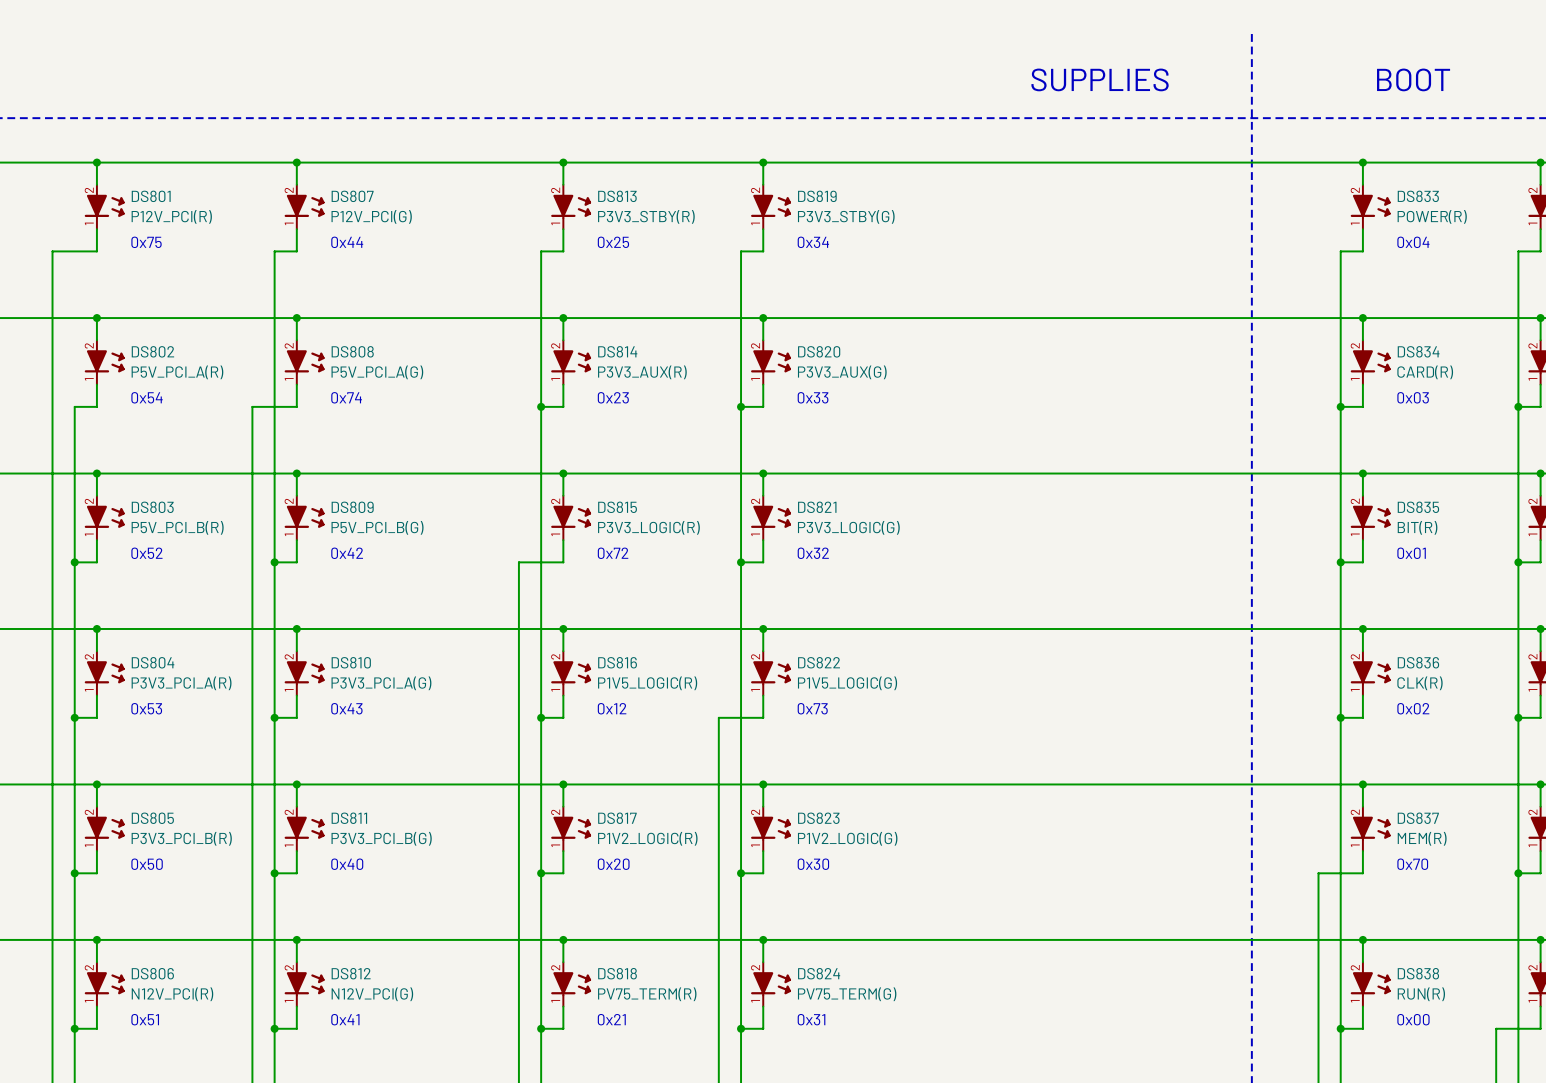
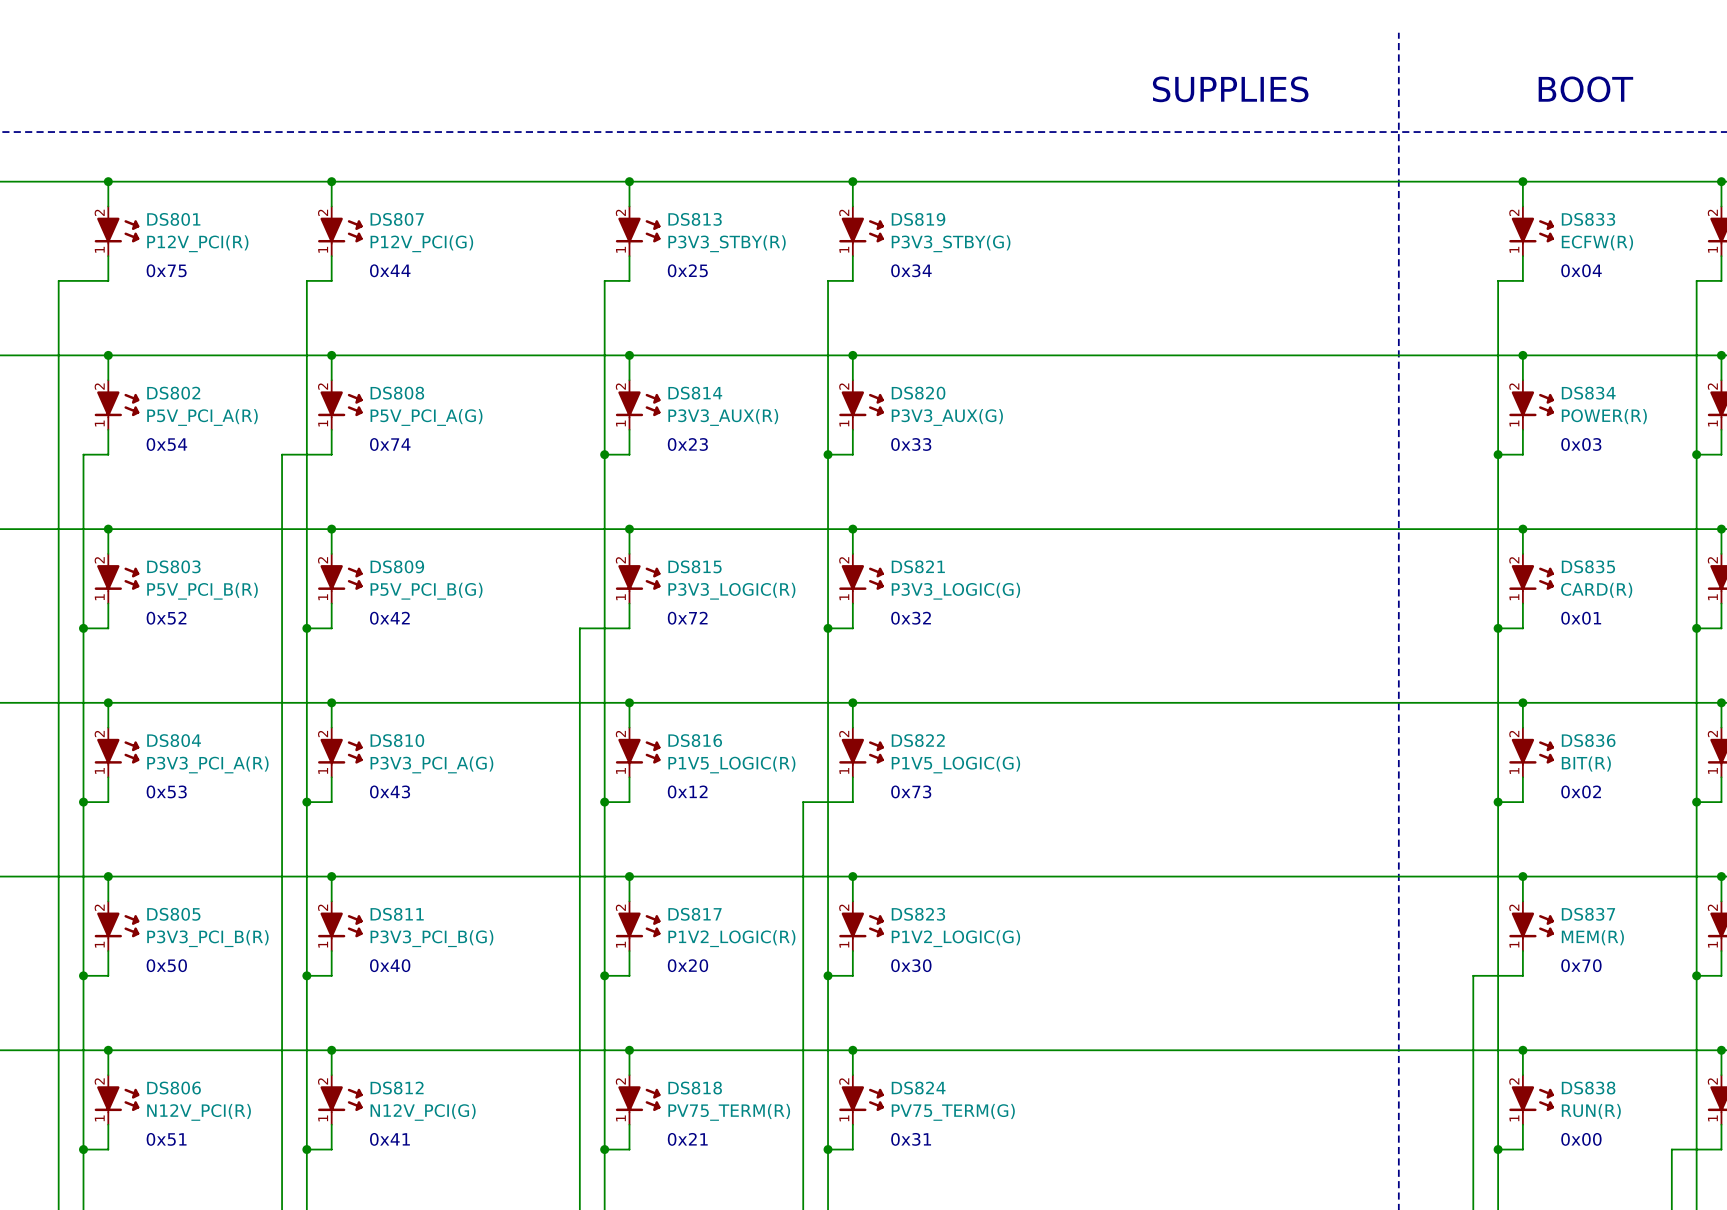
DS833 value: POWER(R) (1432, 216) -> ECFW(R) (1597, 242)
DS834 value: CARD(R) (1425, 372) -> POWER(R) (1604, 416)
DS835 value: BIT(R) (1417, 527) -> CARD(R) (1596, 590)
DS836 value: CLK(R) (1420, 683) -> BIT(R) (1586, 764)

